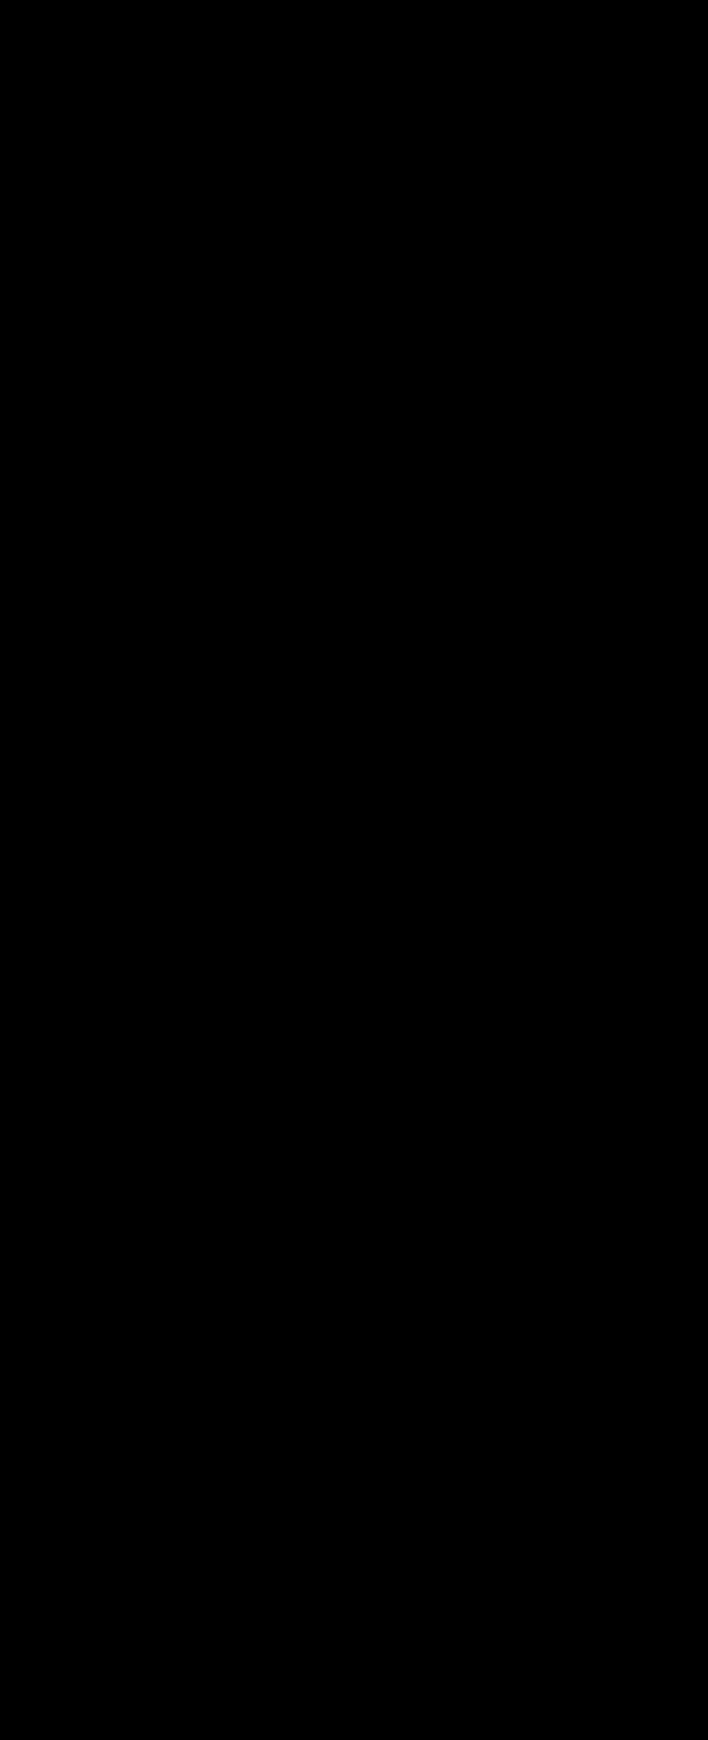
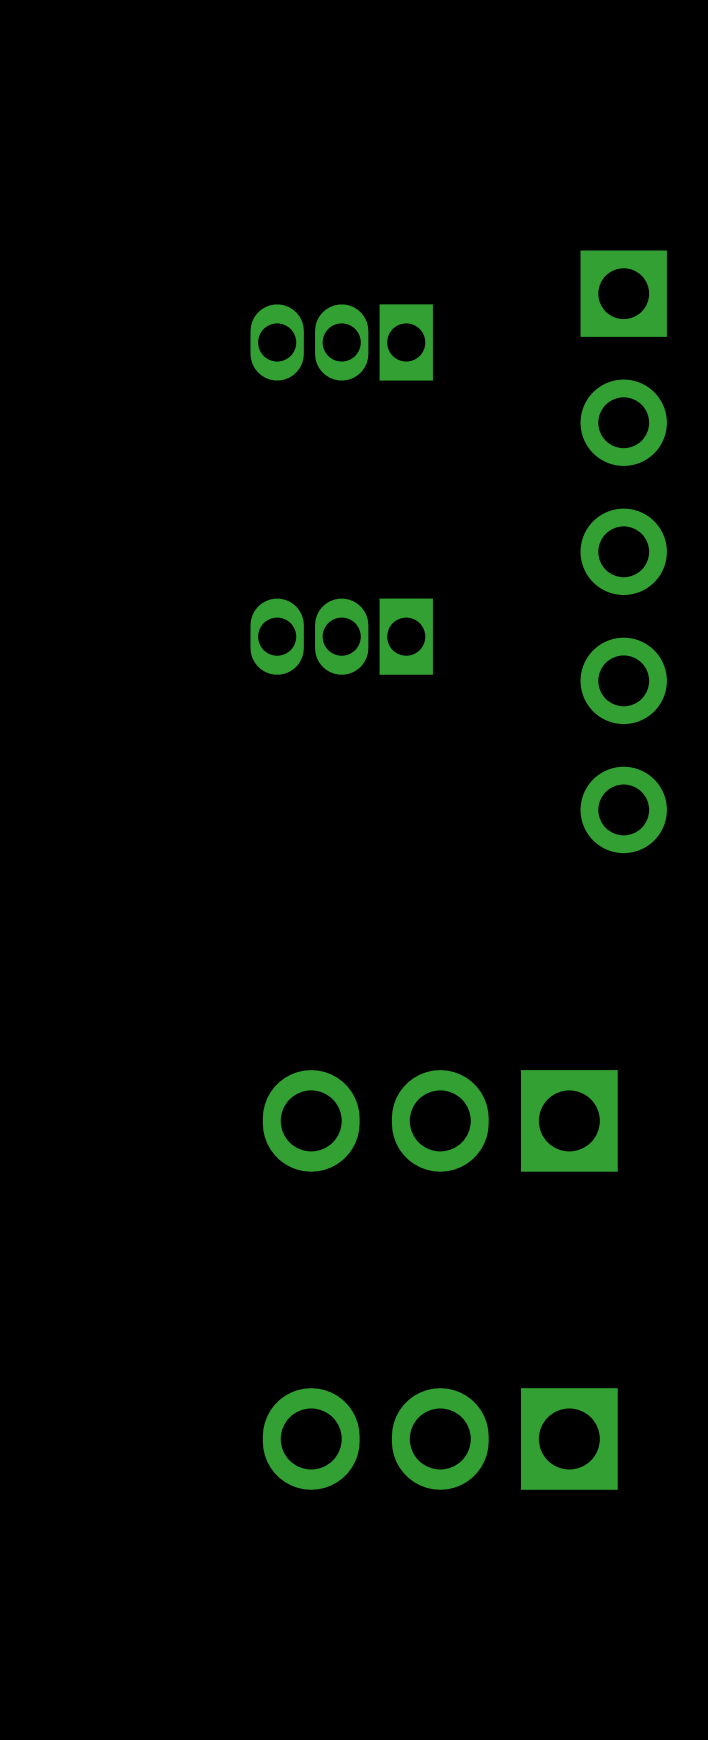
part: none -> (341, 342)
part: none -> (623, 551)
part: none -> (341, 636)
part: none -> (440, 1120)
part: none -> (440, 1438)

